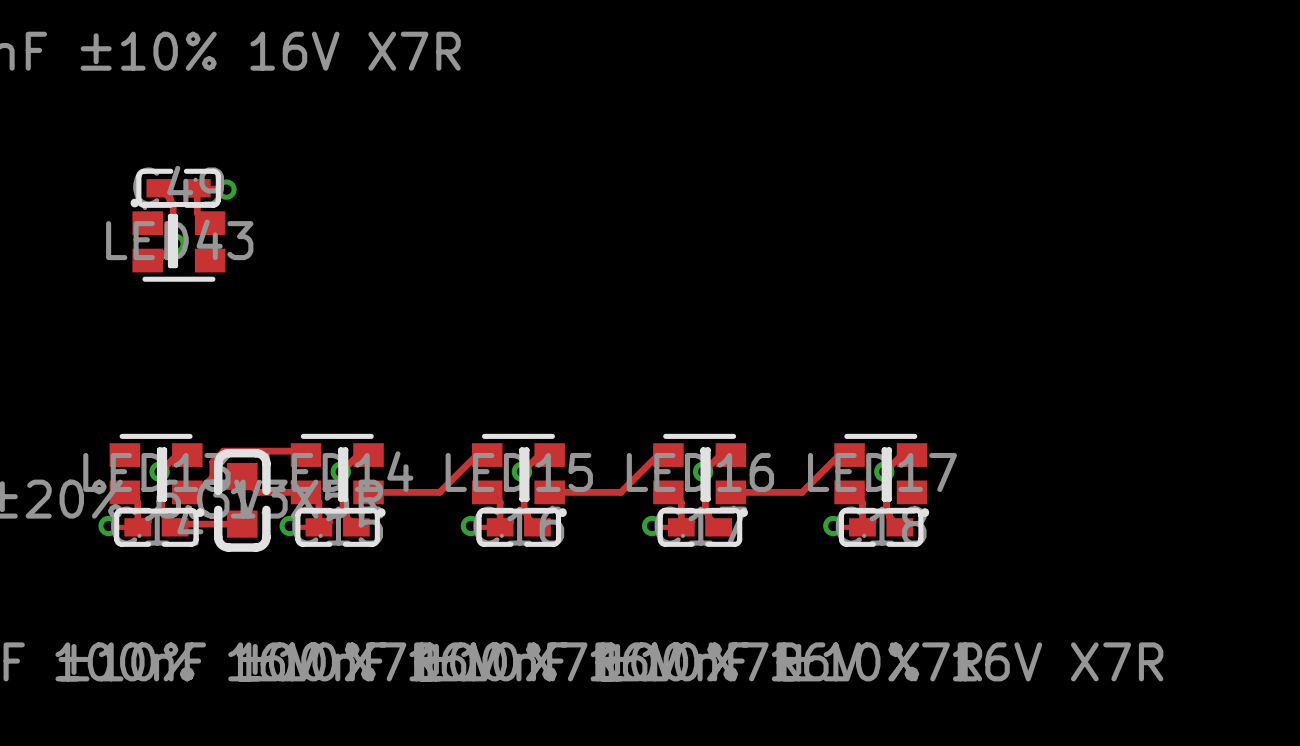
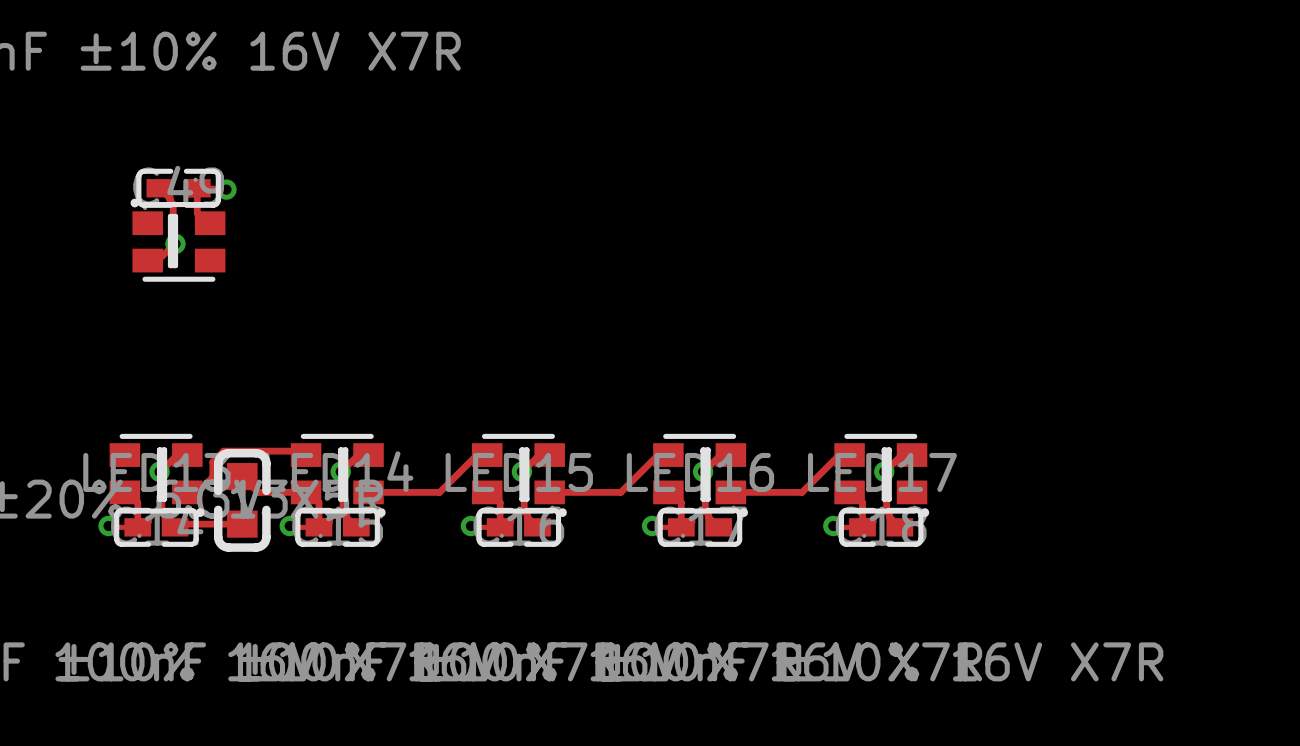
LED43 name: LED43 (179, 239) -> none

